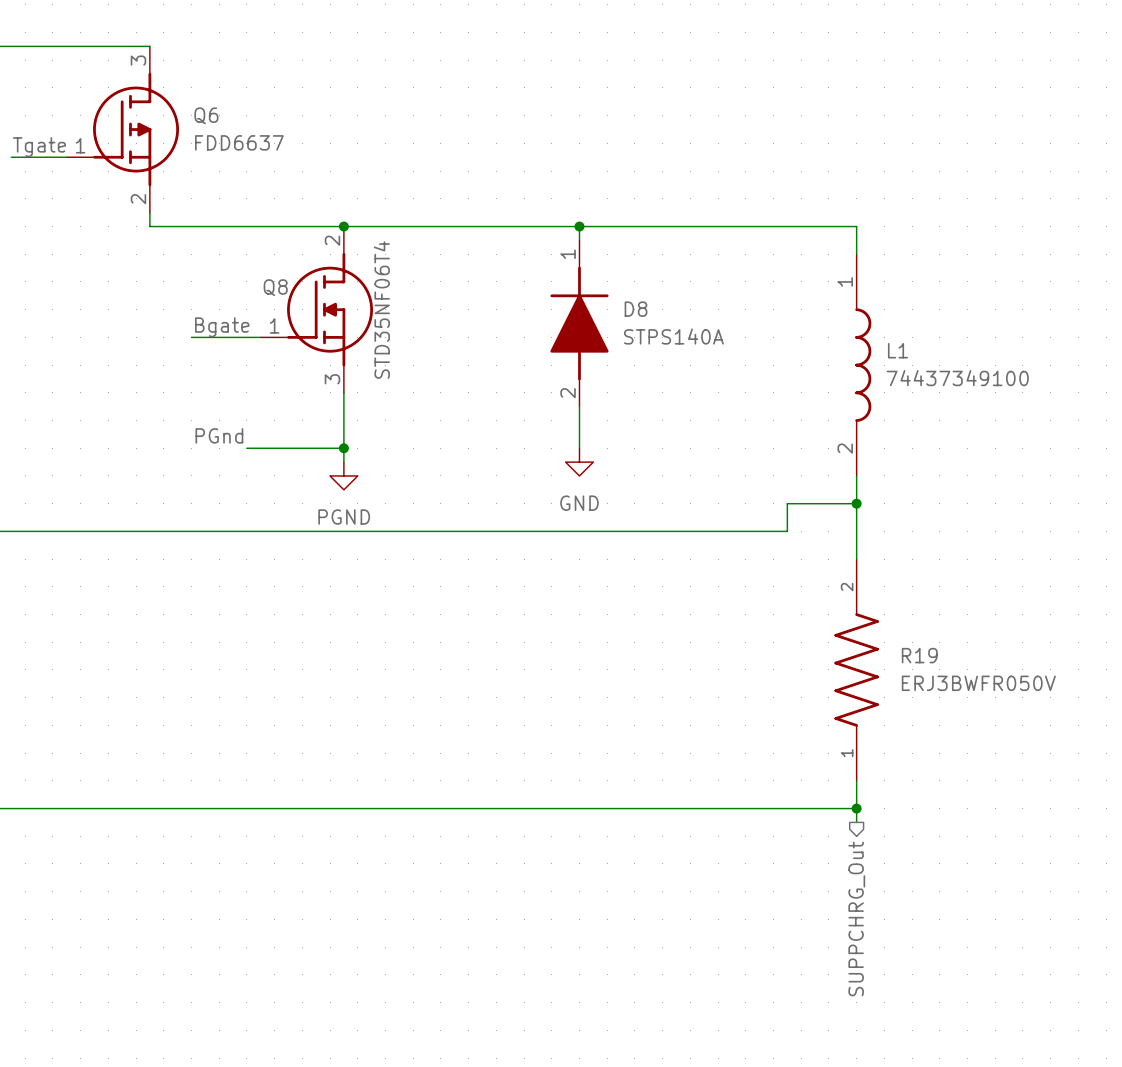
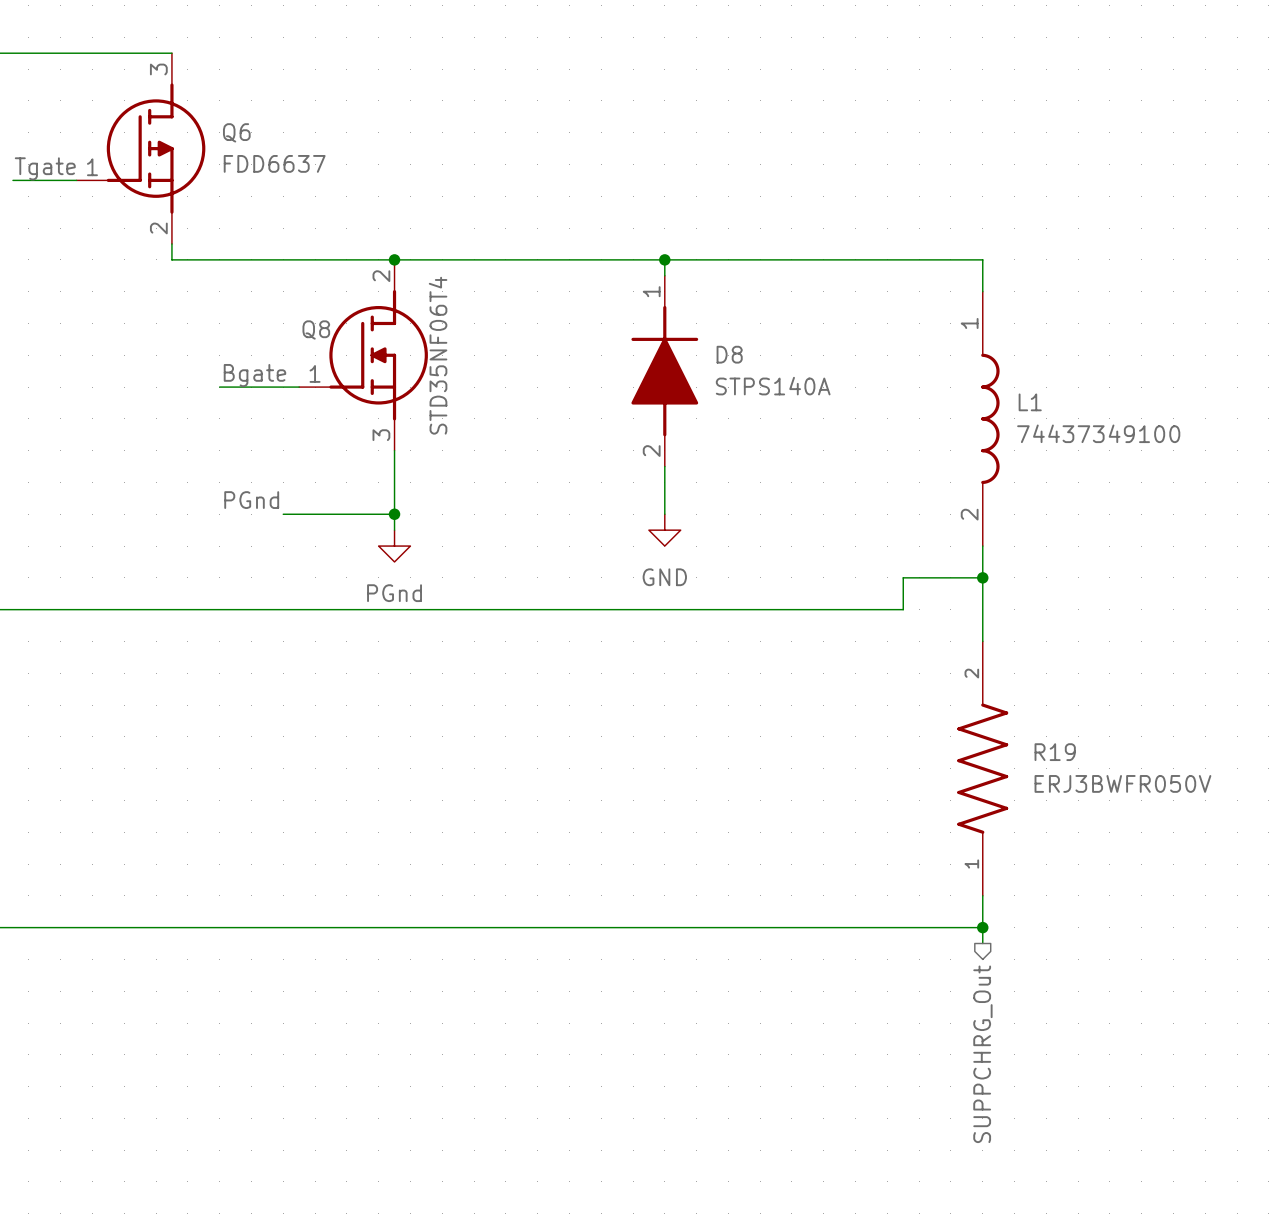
power symbol: PGND (343, 475) -> PGnd (394, 546)

